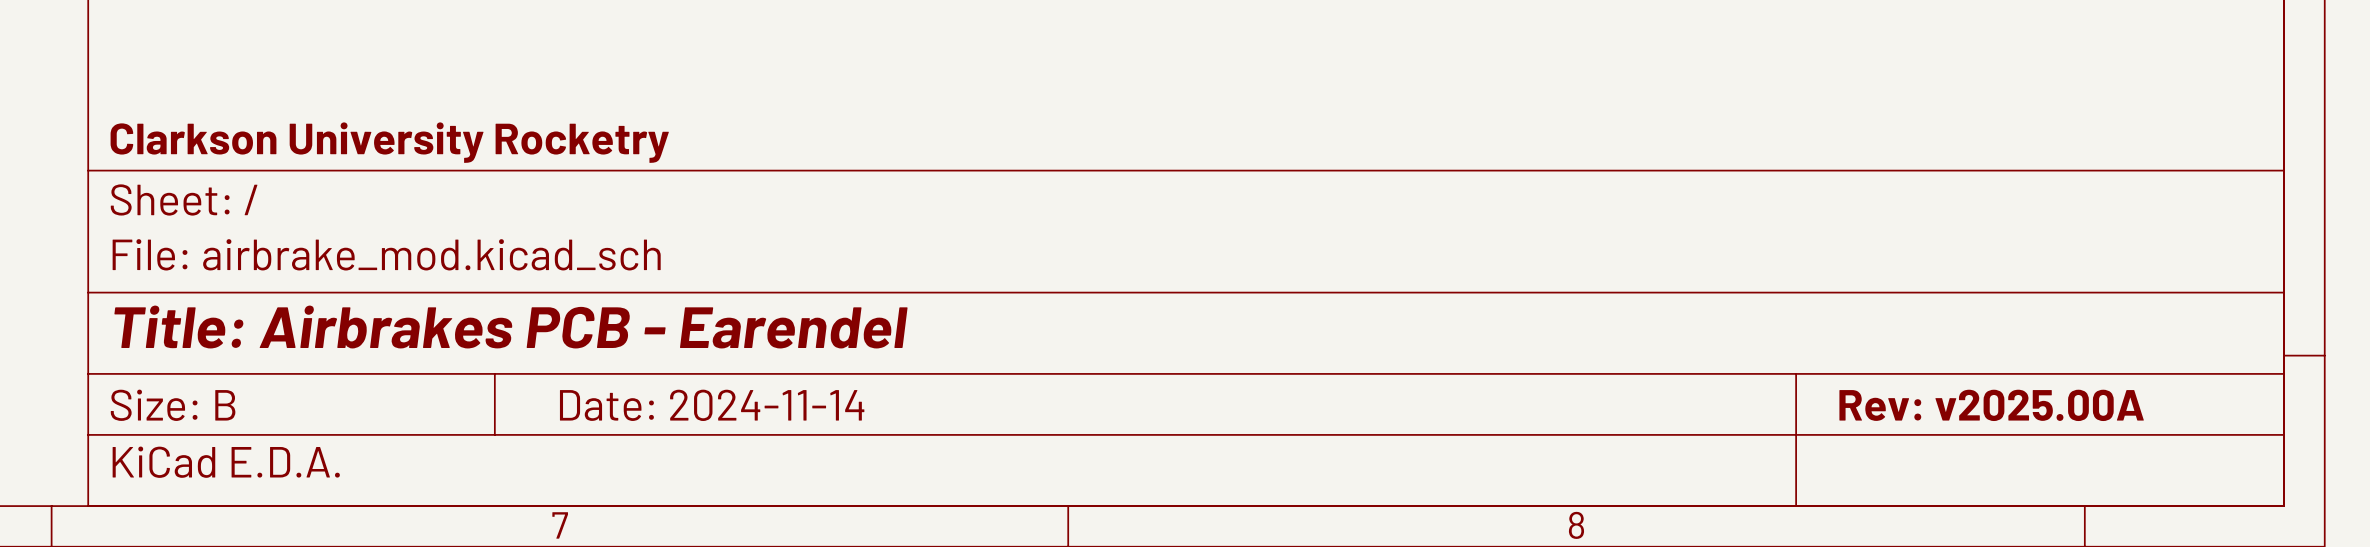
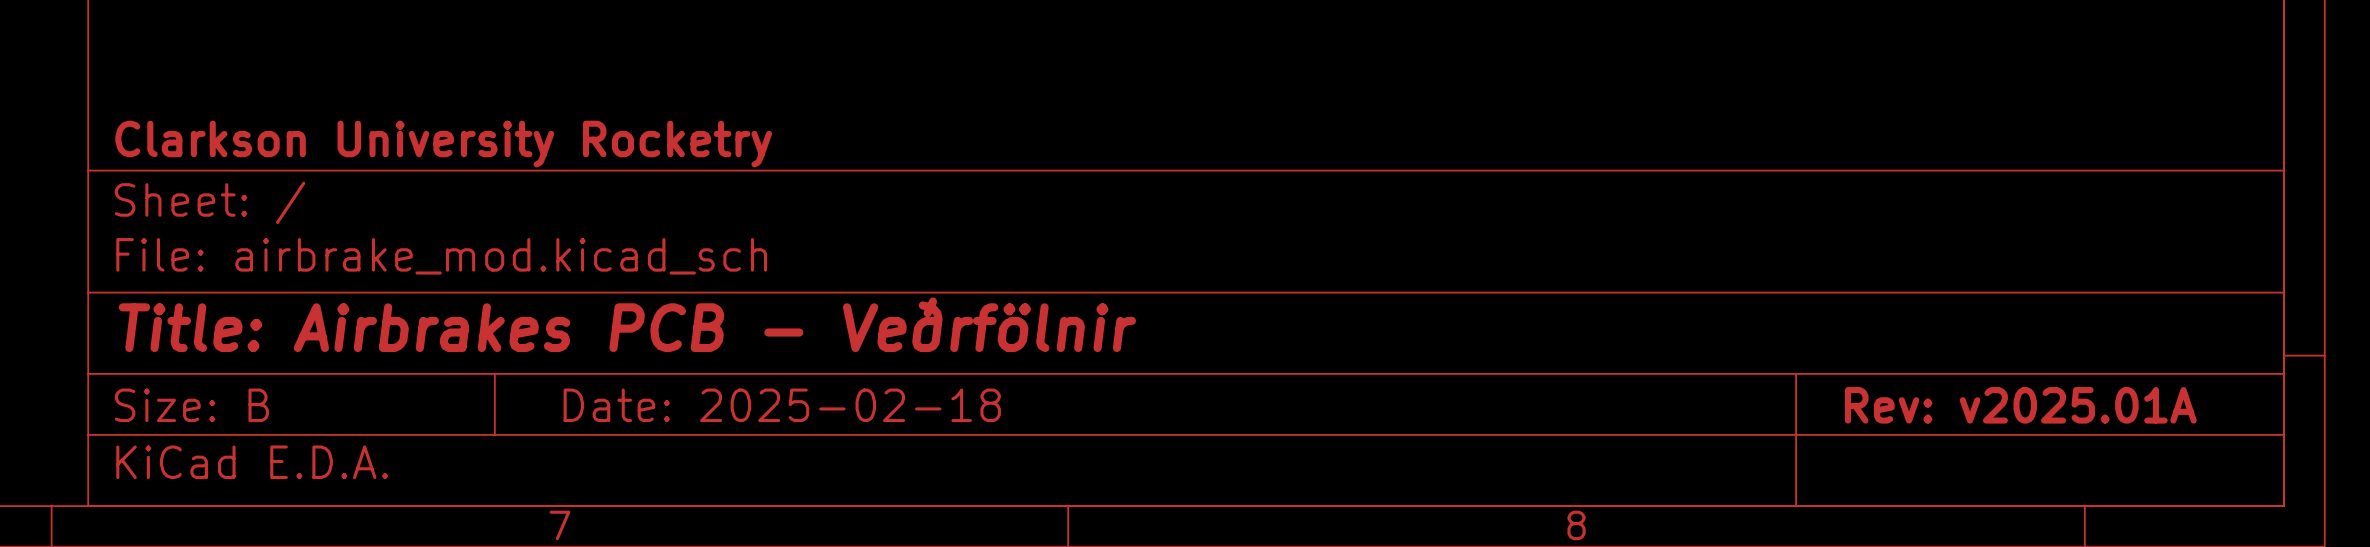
title block: Title: Airbrakes PCB - Earendel (510, 327) -> Title: Airbrakes PCB - Veðrfölnir (627, 324)
title block: Date: 2024-11-14 (712, 405) -> Date: 2025-02-18 (782, 405)
title block: Rev: v2025.00A (1991, 405) -> Rev: v2025.01A (2020, 405)

